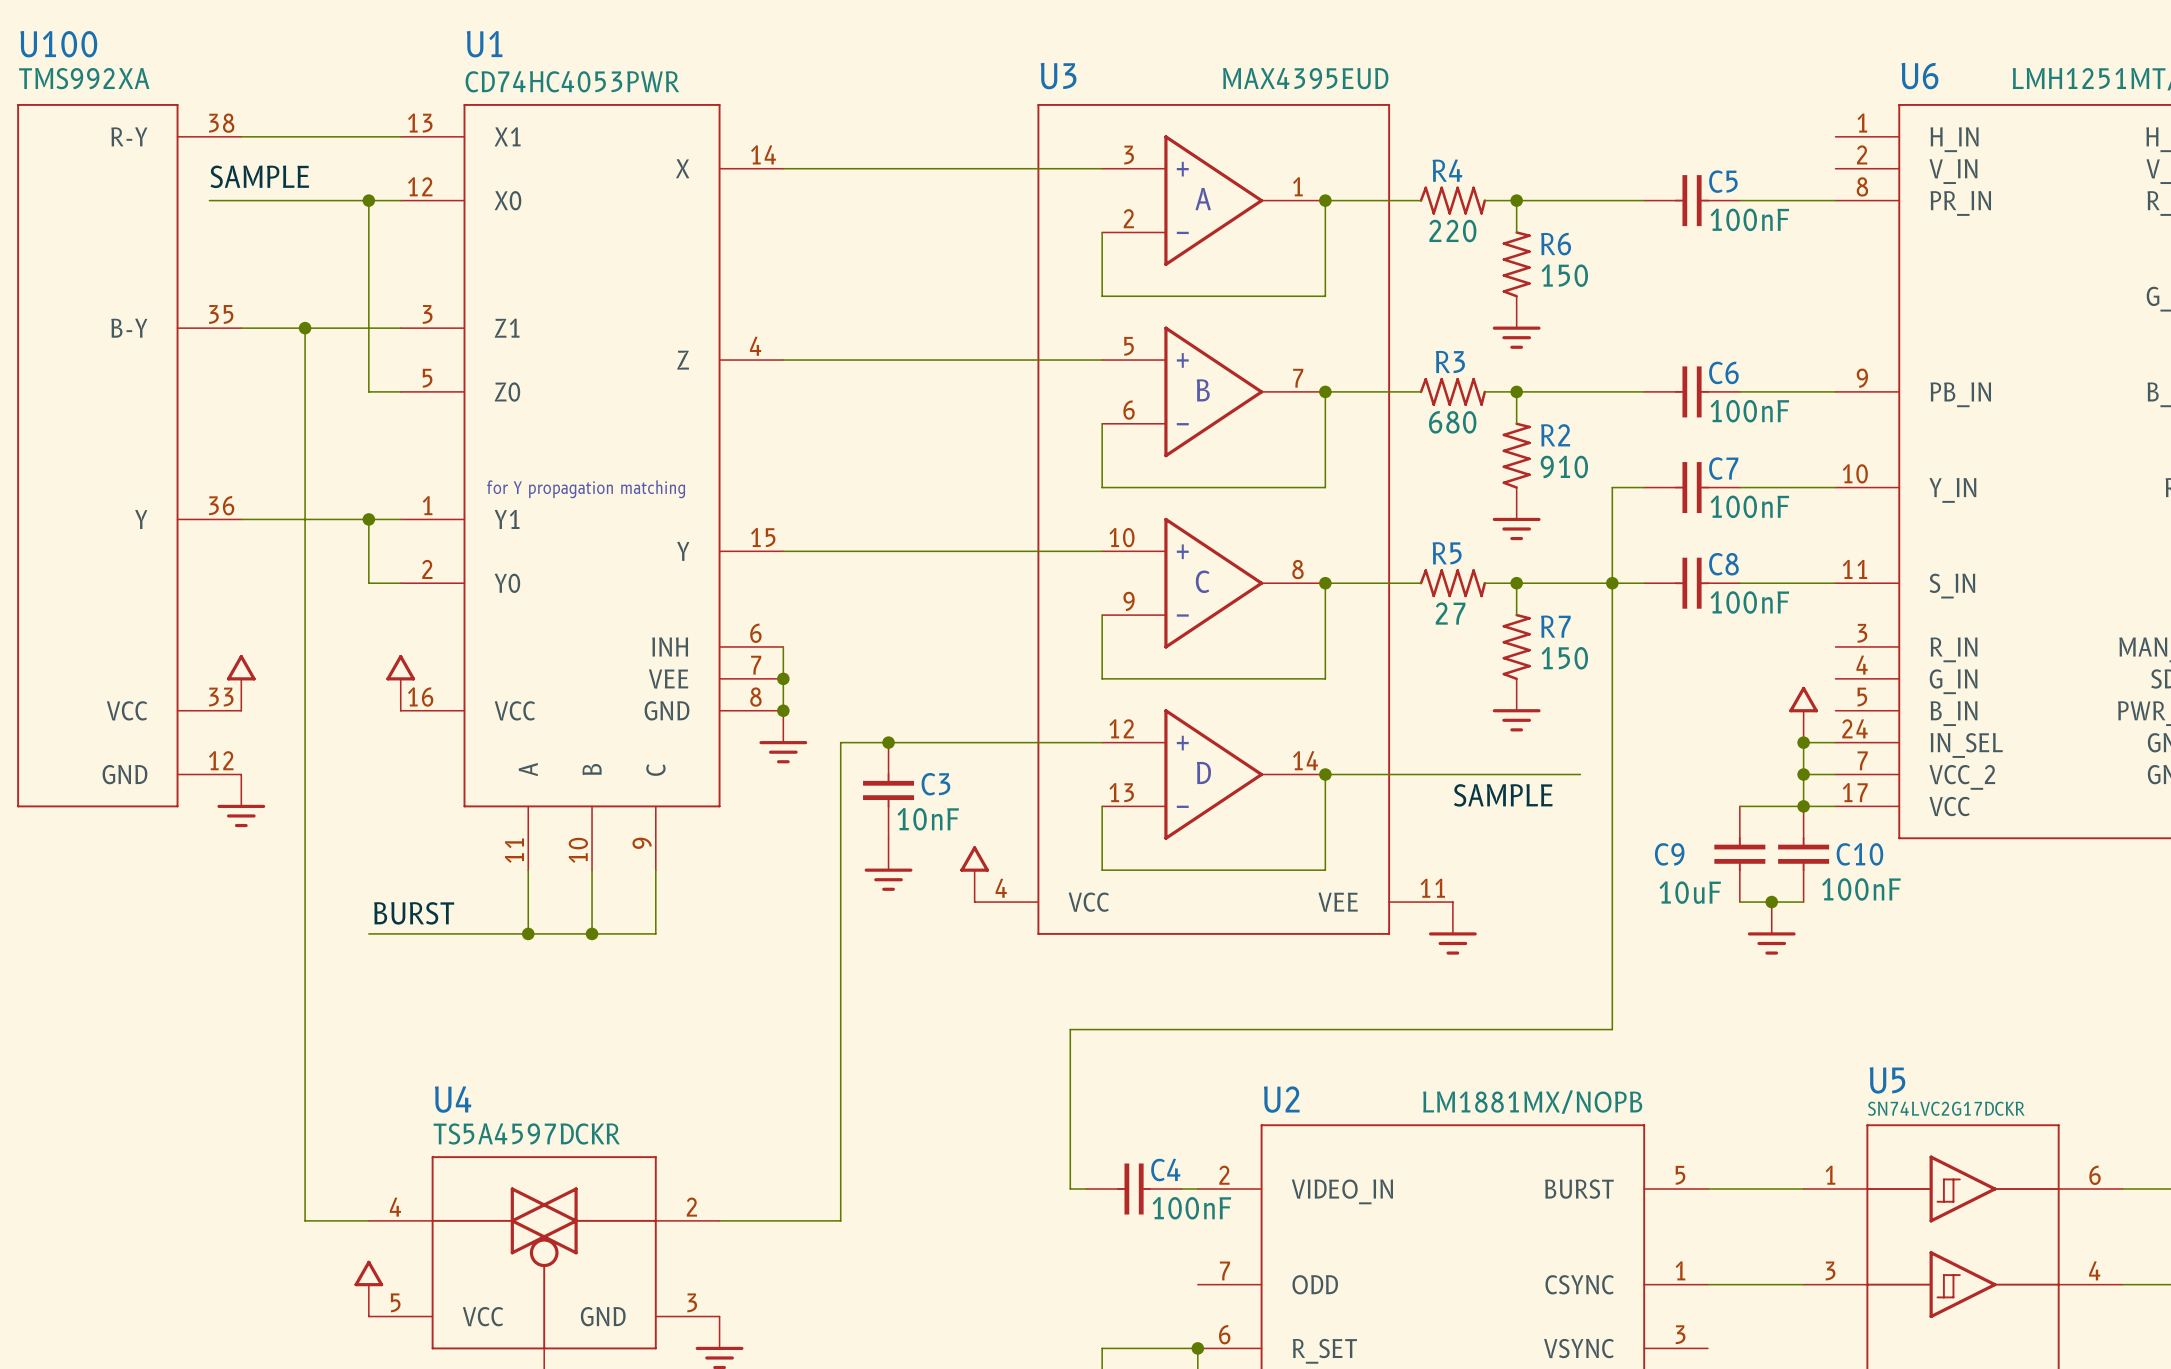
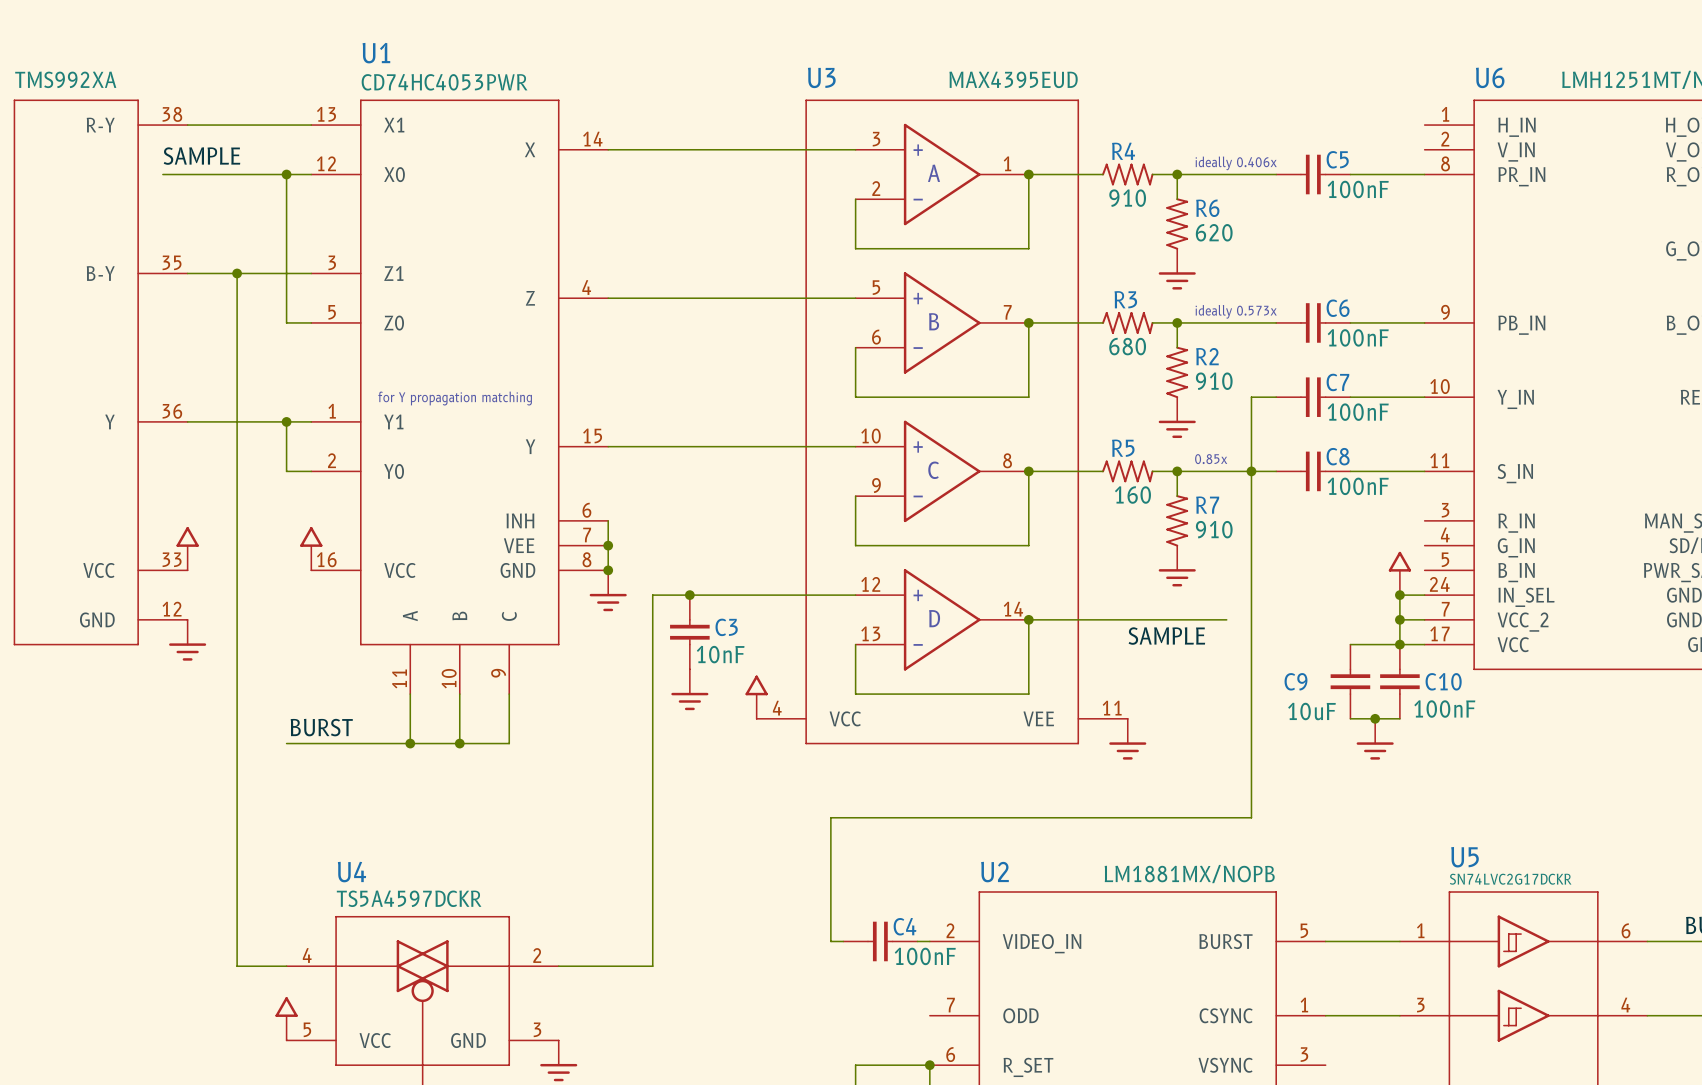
U100 name: U100 (58, 44) -> none
text: none -> ideally 0.406x (1236, 163)
R4 value: 220 (1452, 231) -> 910 (1127, 198)
R6 value: 150 (1564, 275) -> 620 (1214, 232)
text: none -> ideally 0.573x (1236, 311)
text: none -> 0.85x (1211, 459)
R5 value: 27 (1450, 613) -> 160 (1132, 495)
R7 value: 150 (1564, 658) -> 910 (1214, 529)

